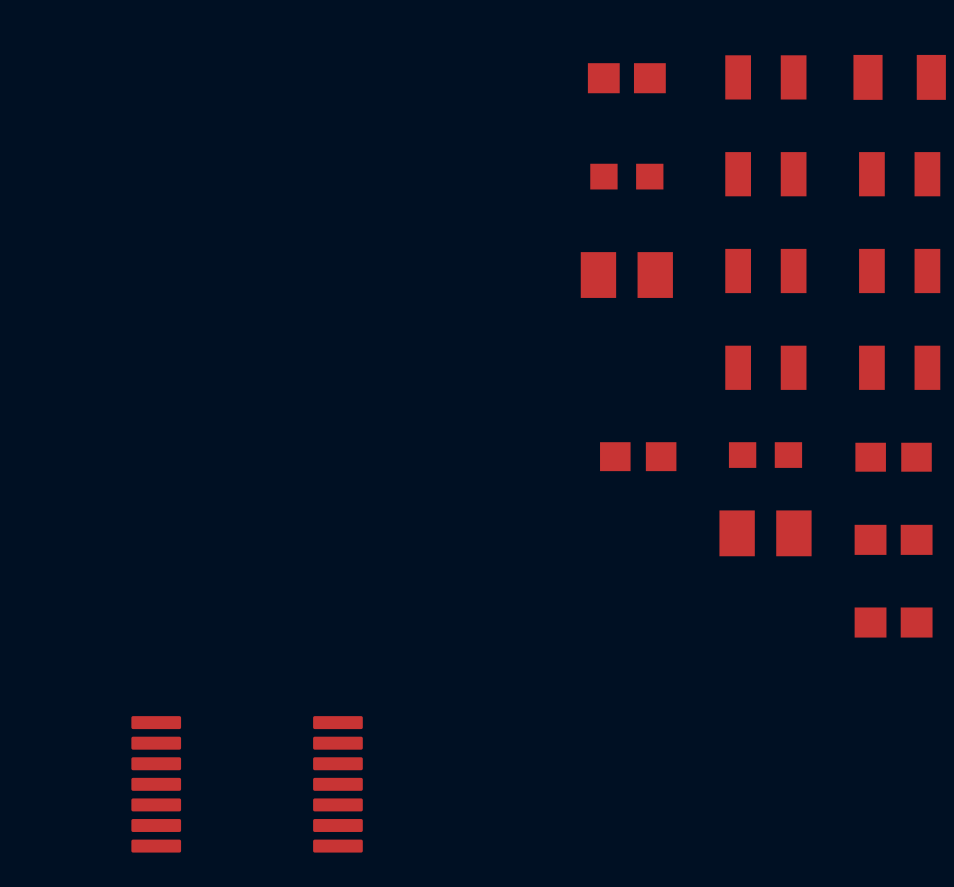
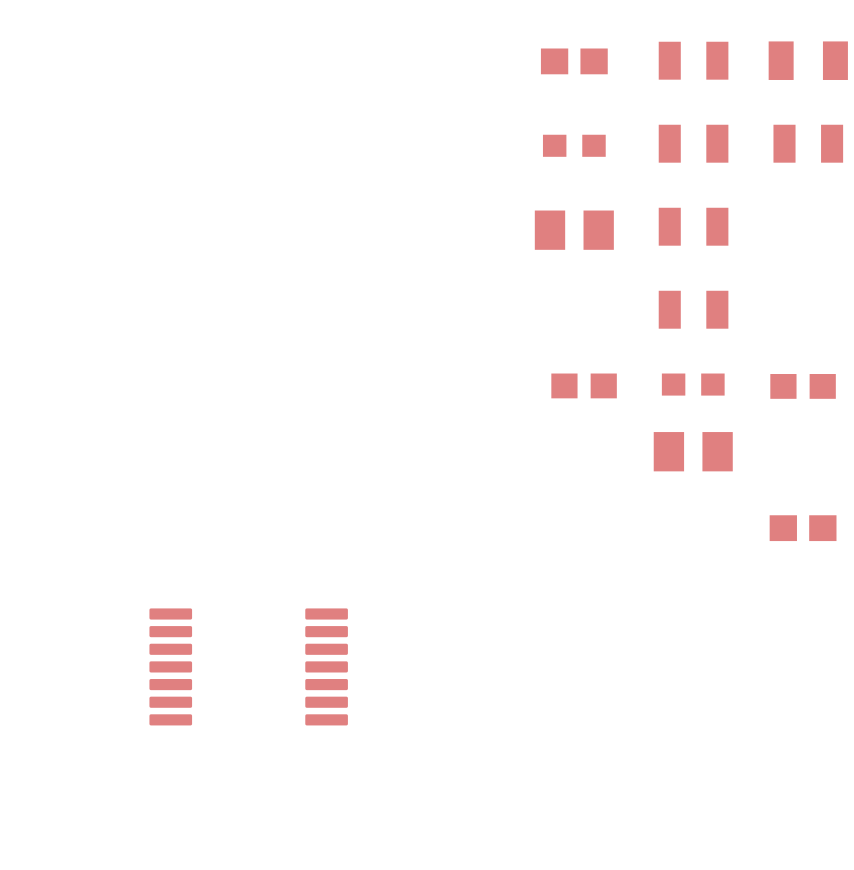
part: (899, 271) -> none
part: (899, 367) -> none
part: (893, 539) -> none

